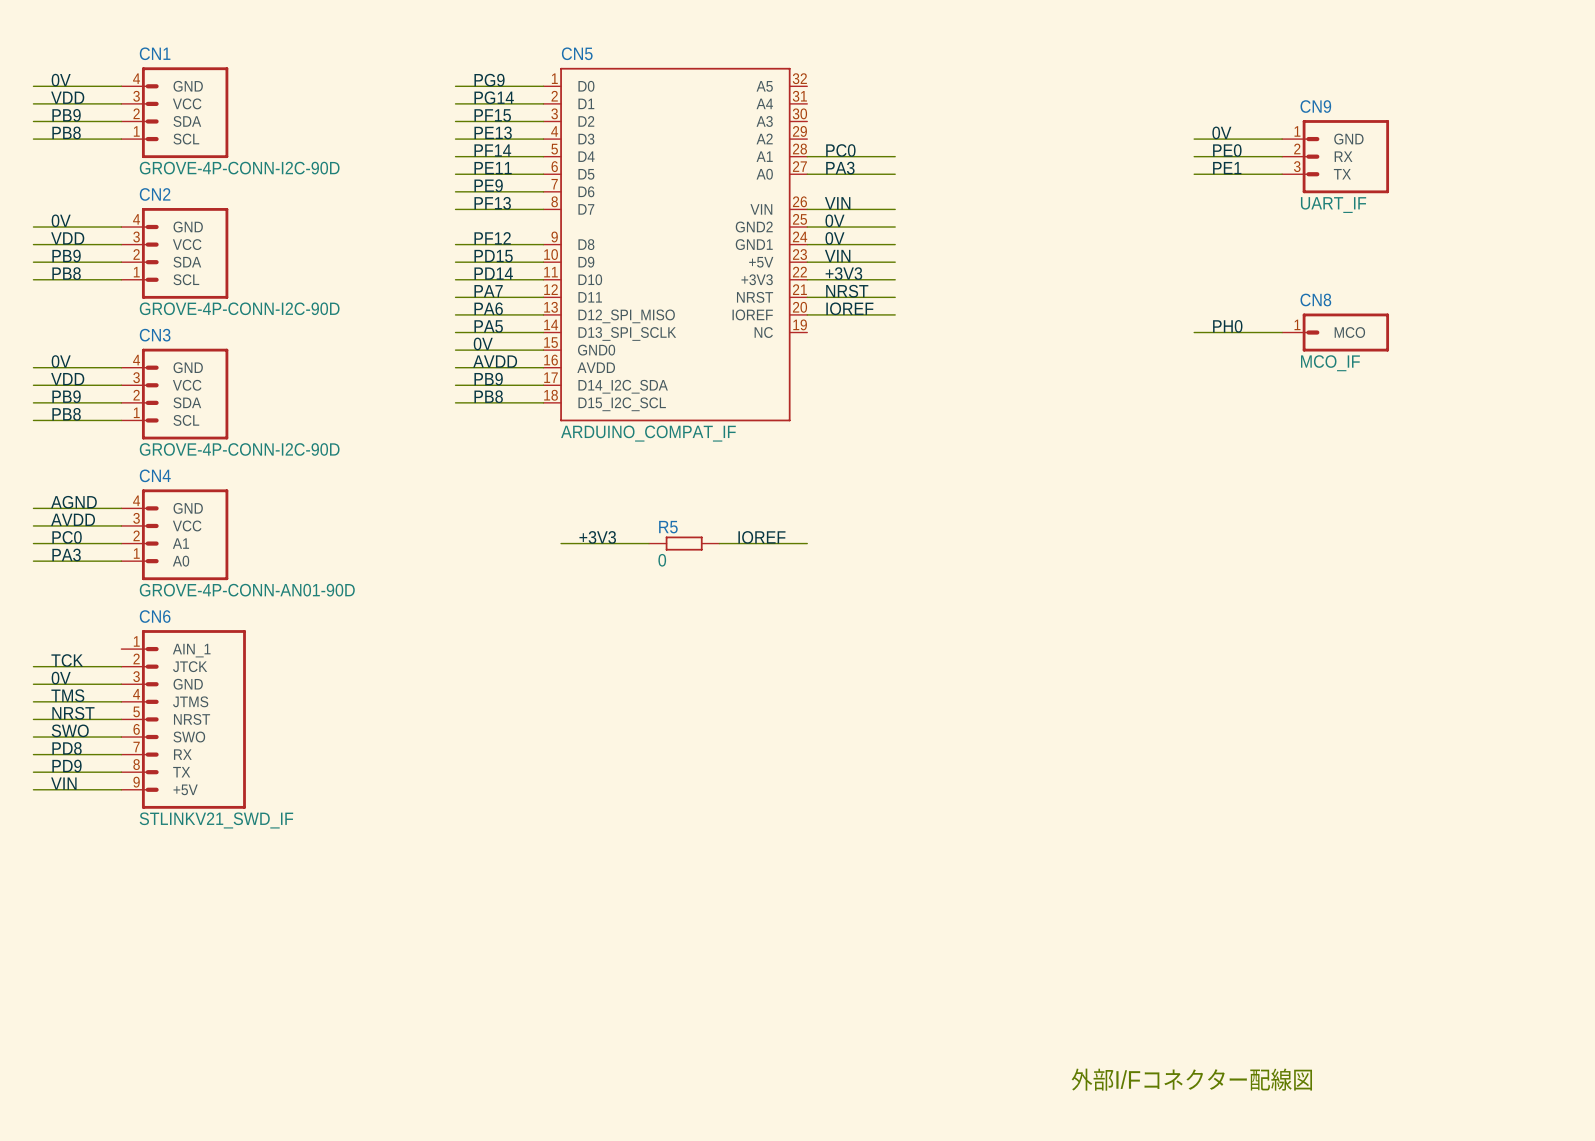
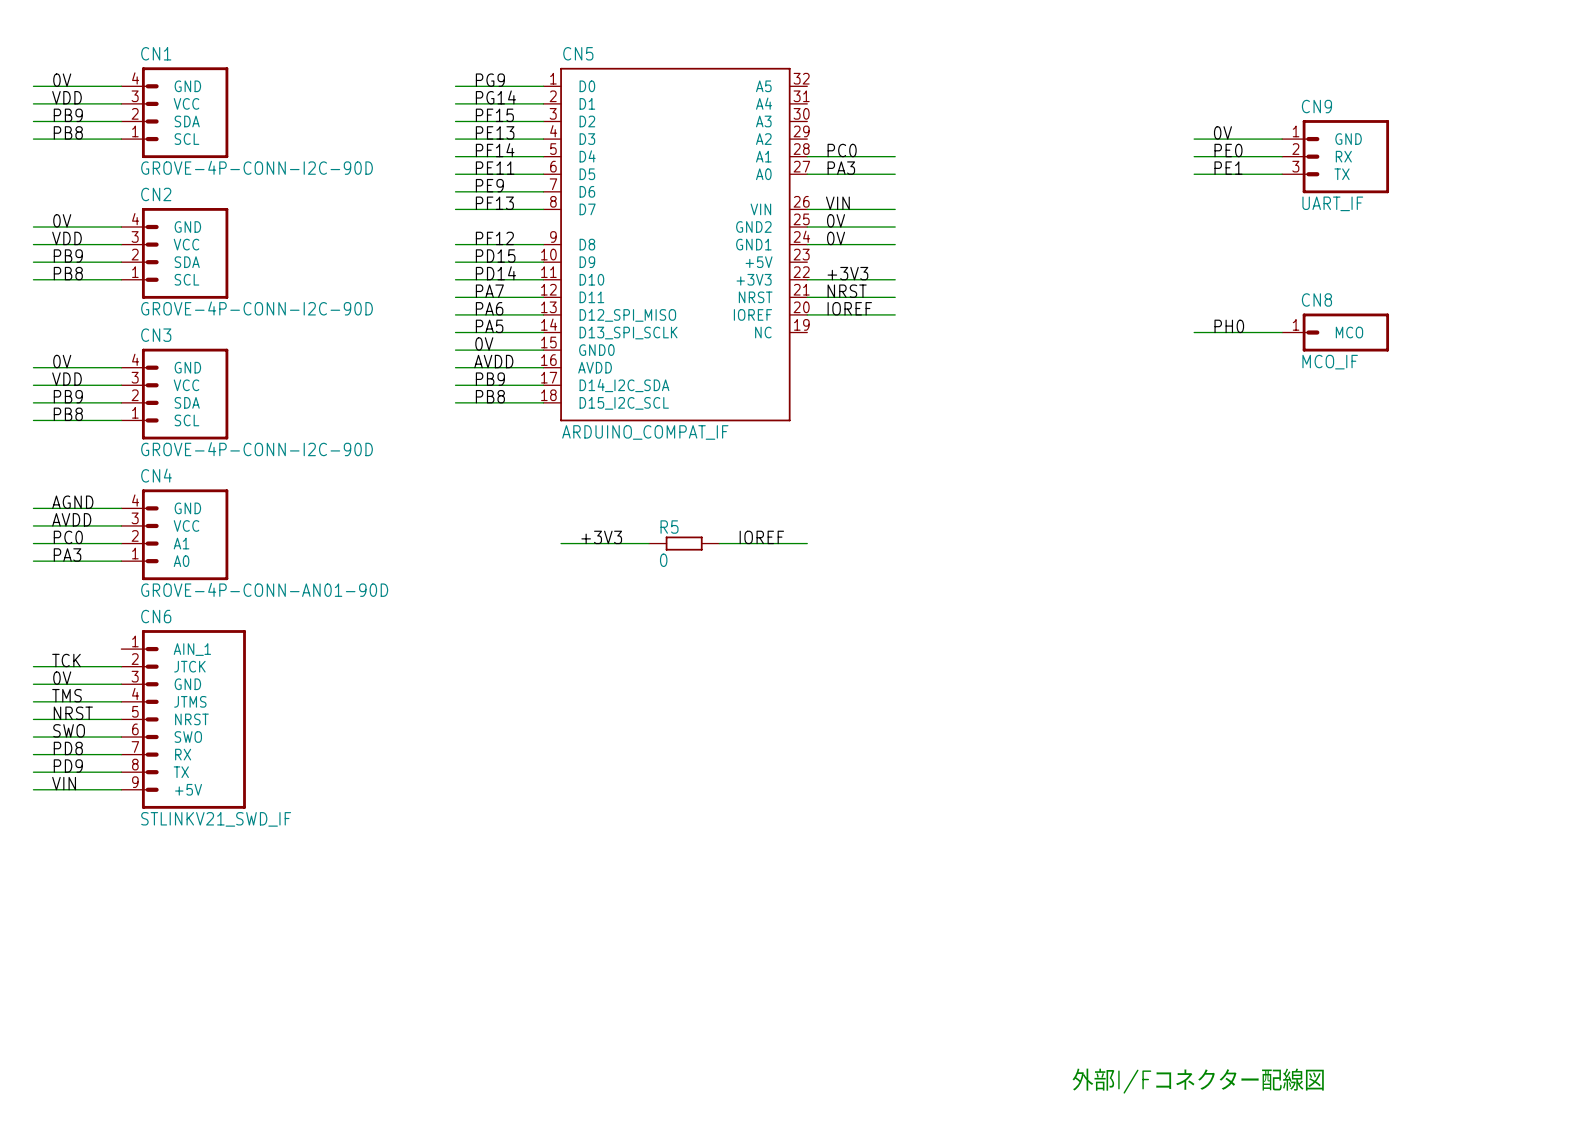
label: VIN (837, 256) -> none
wire: (807, 262) (895, 262) -> none

